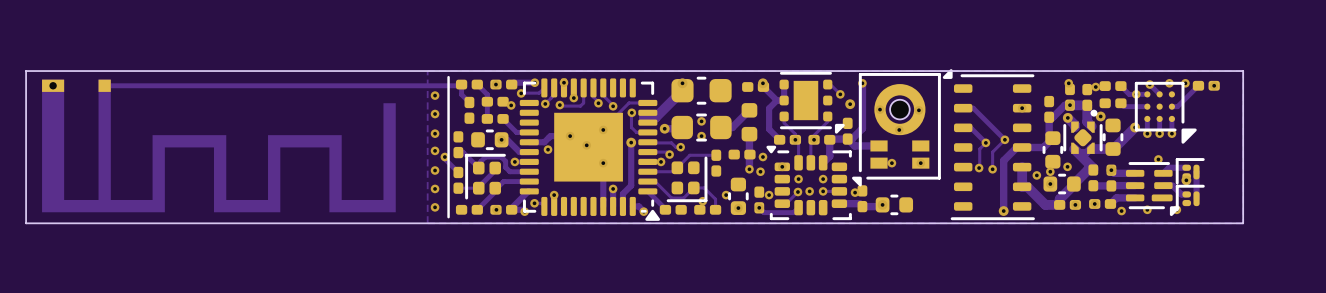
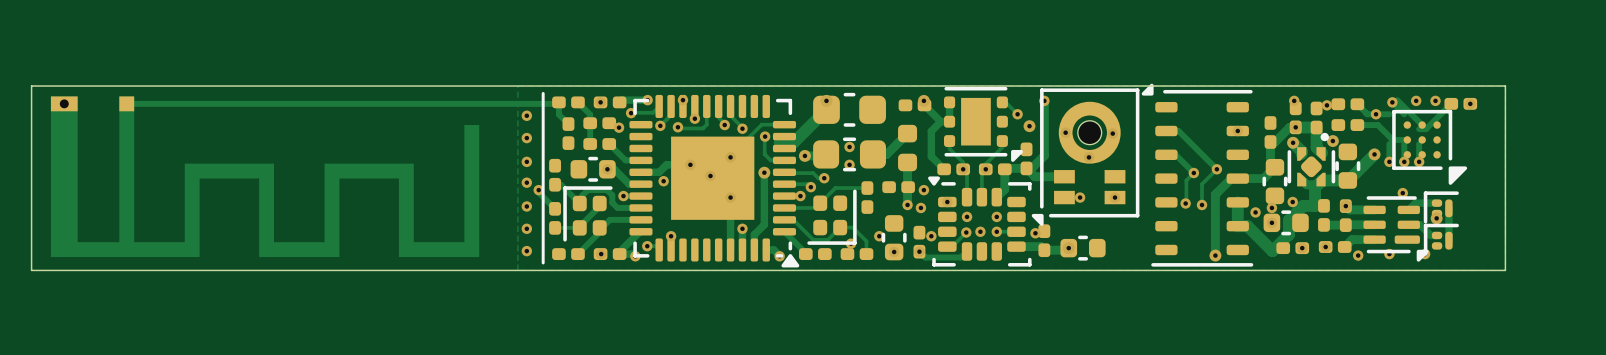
track: none -> (1397, 100) (1422, 125)
track: (1120, 103) (1124, 106) (1147, 106) -> (1357, 125) (1377, 125) (1392, 139) (1407, 139)
part position: (1165, 112) -> (1429, 147)
track: (1074, 149) (1093, 170) (1087, 170) (1073, 184) (1059, 199) (1059, 204) (1045, 204) (1027, 186) -> (1322, 180) (1315, 187) (1315, 205) (1303, 205) (1288, 220) (1288, 234) (1272, 251) (1247, 226) (1244, 226)

